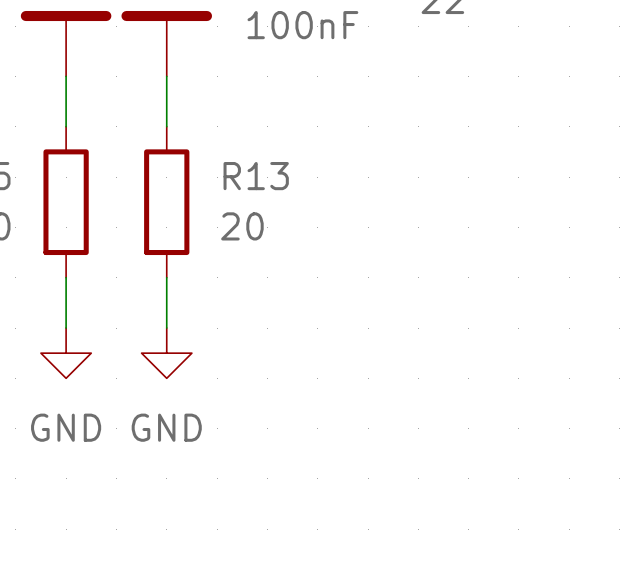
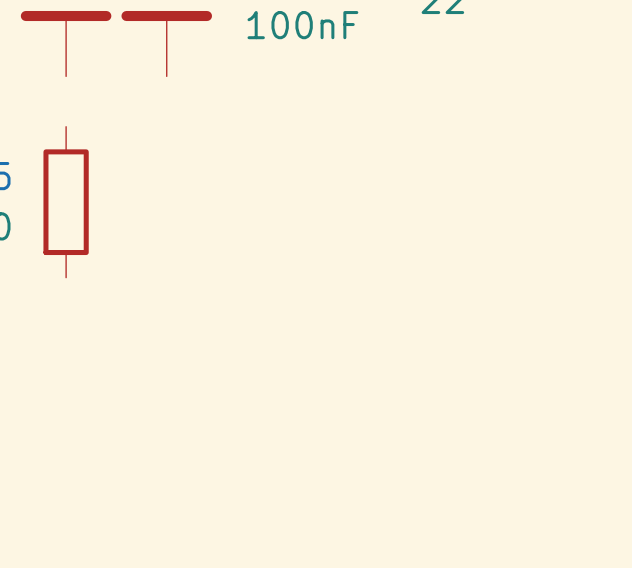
wire: (66, 76) (66, 126) -> none
wire: (166, 76) (166, 126) -> none
R13: 20 (166, 202) -> none
wire: (66, 277) (66, 328) -> none
wire: (166, 277) (166, 328) -> none
power symbol: GND (66, 353) -> none
power symbol: GND (166, 353) -> none

